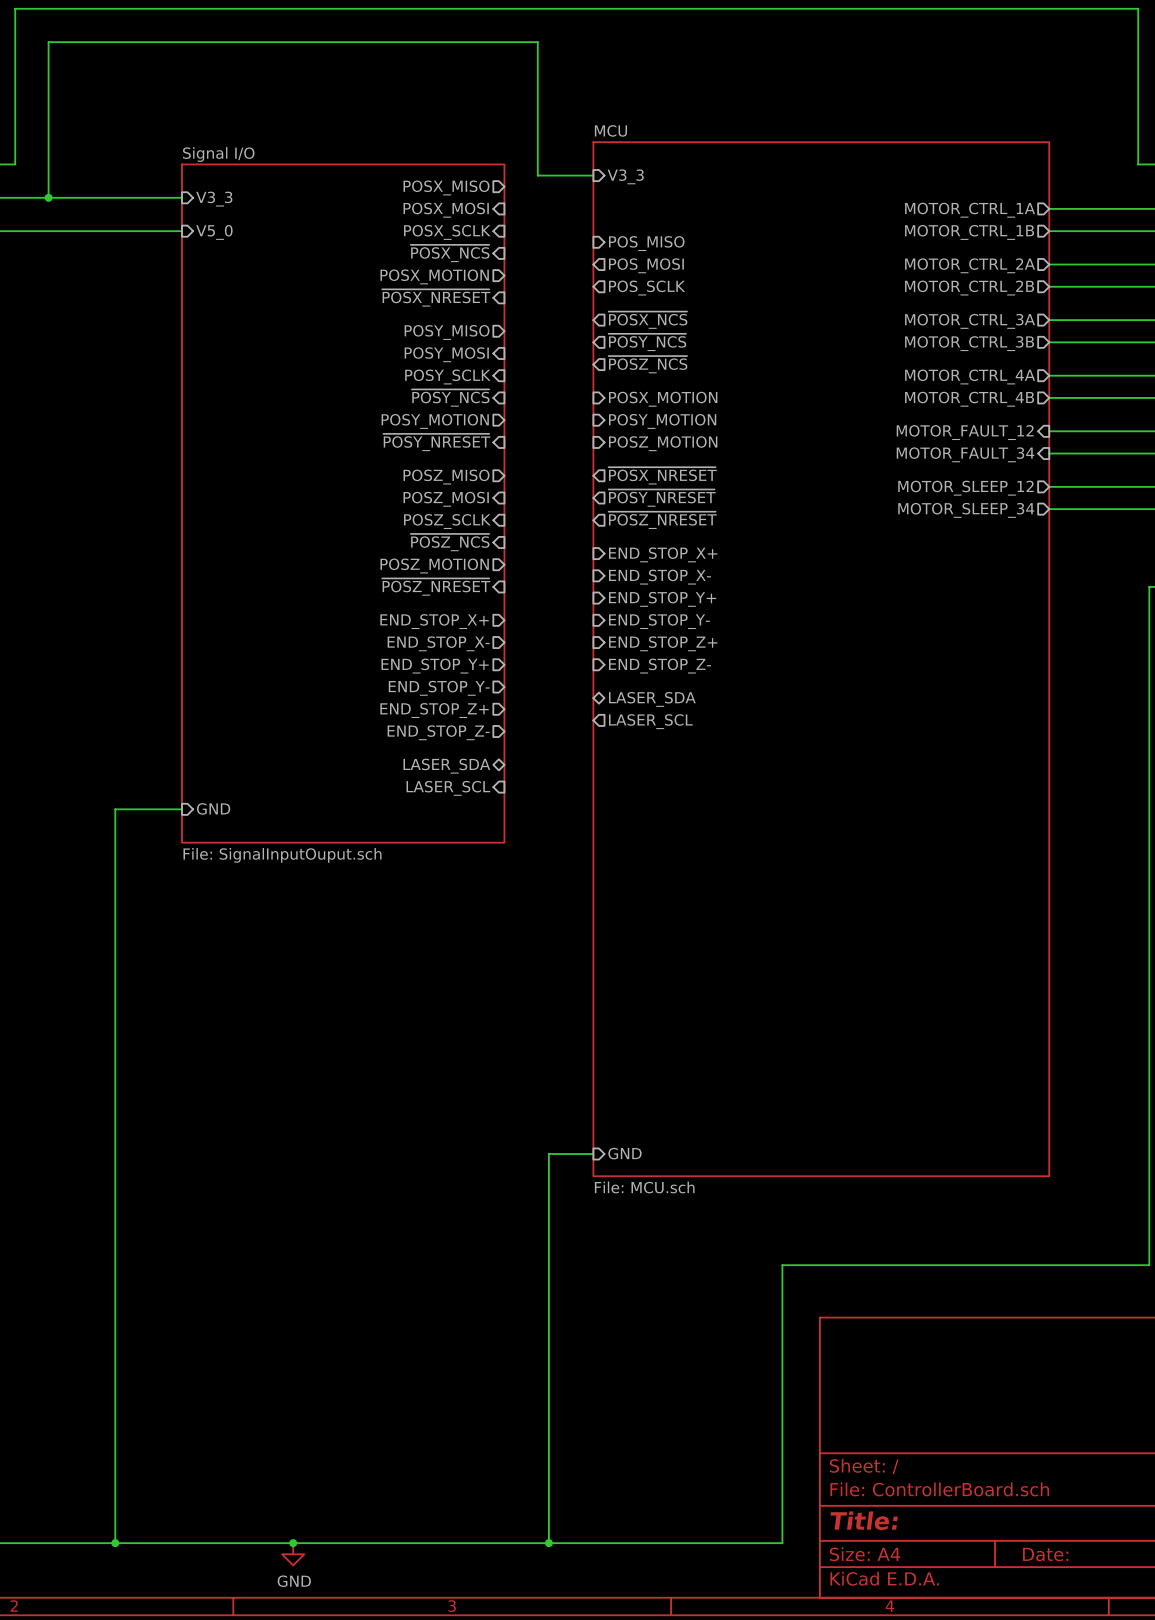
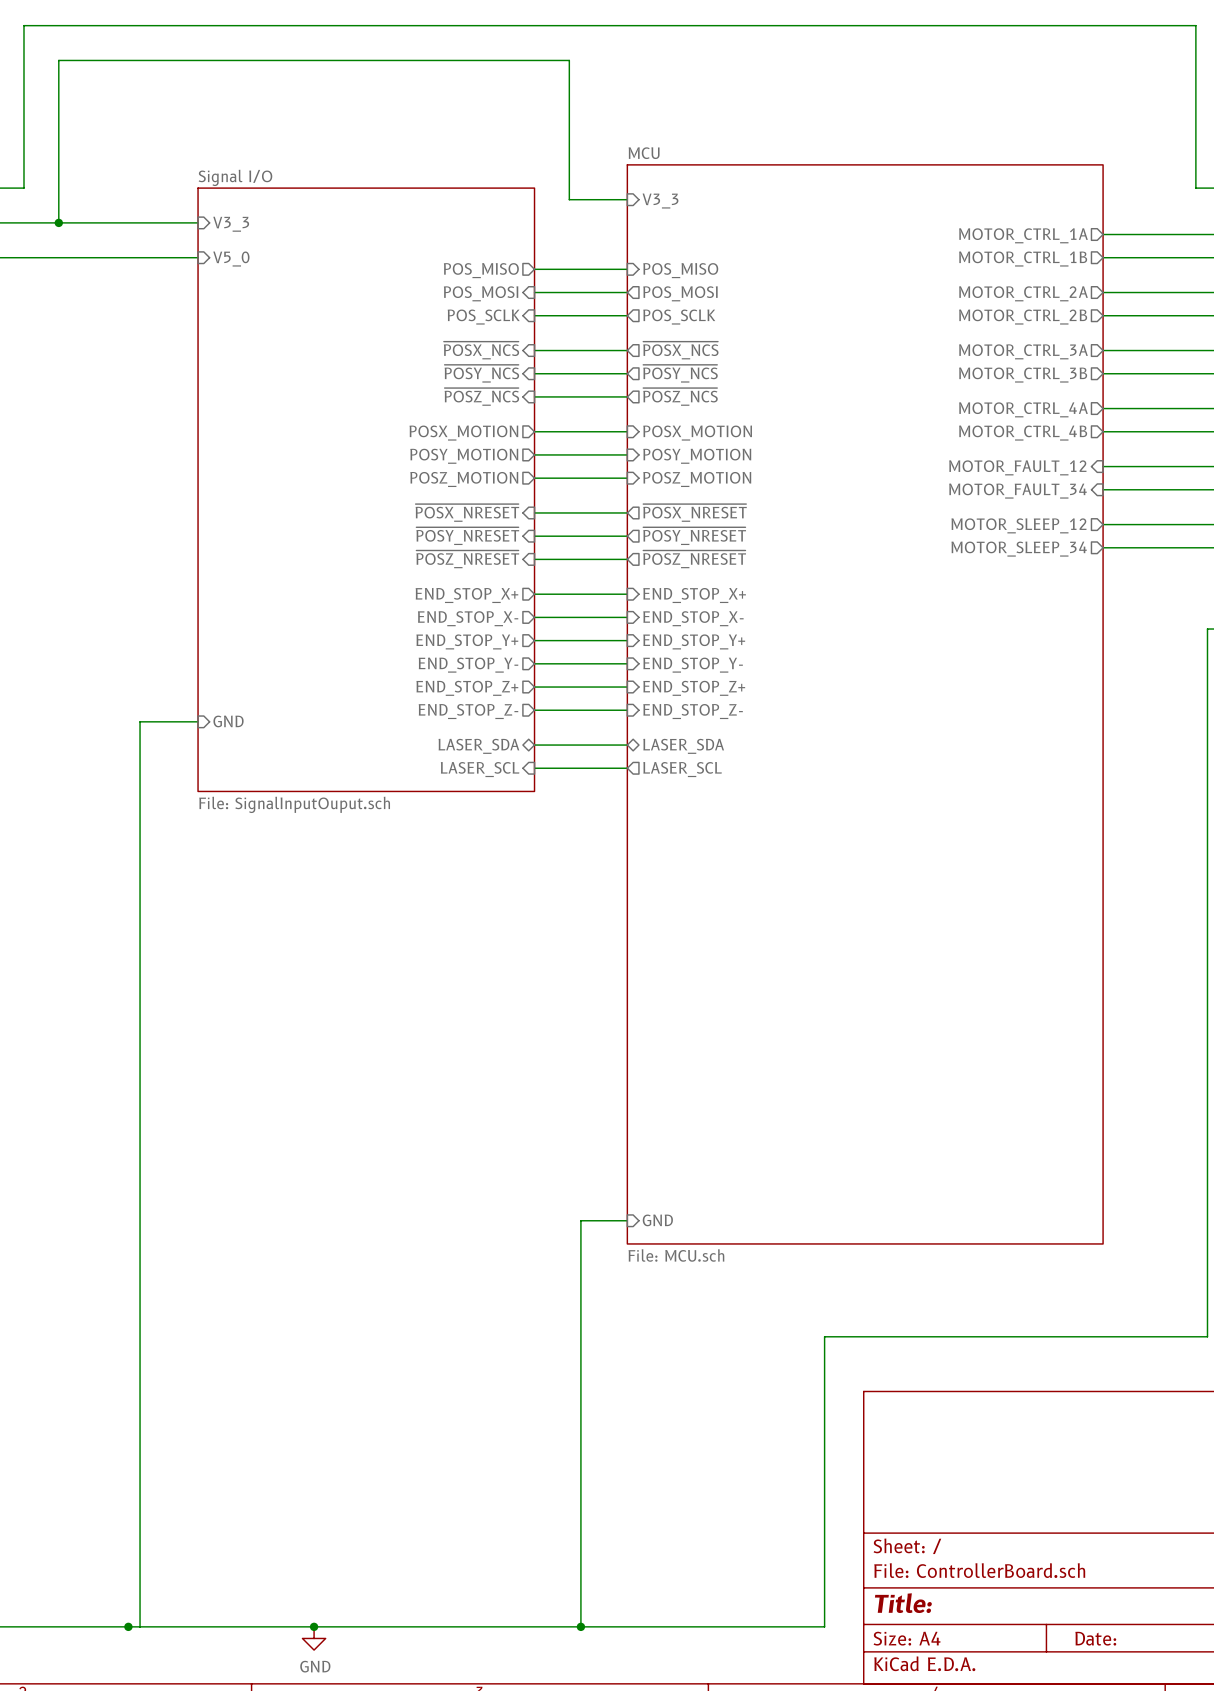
sheet pin: POSX_MISO (446, 187) -> none
sheet pin: POSX_MOSI (446, 210) -> none
sheet pin: POSX_SCLK (447, 232) -> none
wire: none -> (534, 269) (627, 269)
sheet pin: none -> POS_MISO (481, 270)
sheet pin position: ~{POSX_NCS} (450, 253) -> ~{POSX_NCS} (481, 350)
wire: none -> (534, 292) (627, 292)
sheet pin shape: output (434, 276) -> input (481, 293)
sheet pin: POSX_MOTION (434, 276) -> POS_MOSI (481, 293)
wire: none -> (534, 315) (627, 315)
sheet pin: none -> POS_SCLK (483, 317)
sheet pin: ~{POSX_NRESET} (436, 297) -> none
wire: none -> (534, 350) (627, 350)
sheet pin: POSY_MISO (447, 332) -> none
sheet pin: none -> ~{POSY_NCS} (481, 373)
wire: none -> (534, 373) (627, 373)
sheet pin: POSY_MOSI (446, 354) -> none
wire: none -> (534, 396) (627, 396)
sheet pin: POSY_SCLK (447, 376) -> none
wire: none -> (534, 431) (627, 431)
sheet pin shape: input (450, 398) -> output (463, 433)
sheet pin: ~{POSY_NCS} (450, 398) -> POSX_MOTION (463, 433)
wire: none -> (534, 454) (627, 454)
sheet pin shape: input (436, 442) -> output (464, 479)
sheet pin: ~{POSY_NRESET} (436, 442) -> POSZ_MOTION (464, 479)
wire: none -> (534, 478) (627, 478)
sheet Signal I/O: none -> File: SignalInputOuput.sch (366, 489)
wire: none -> (534, 512) (627, 512)
sheet pin shape: output (446, 477) -> input (467, 512)
sheet pin: POSZ_MISO (446, 477) -> ~{POSX_NRESET} (467, 512)
wire: none -> (534, 536) (627, 536)
sheet pin: POSZ_MOSI (446, 499) -> ~{POSY_NRESET} (467, 536)
sheet Signal I/O: File: SignalInputOuput.sch (343, 503) -> none
wire: none -> (534, 559) (627, 559)
sheet pin: POSZ_SCLK (447, 521) -> ~{POSZ_NRESET} (467, 559)
sheet pin position: ~{POSZ_NCS} (450, 542) -> ~{POSZ_NCS} (481, 396)
wire: none -> (534, 594) (627, 594)
sheet pin: none -> END_STOP_X+ (466, 595)
sheet pin: POSZ_MOTION (434, 566) -> none
wire: none -> (534, 617) (627, 617)
sheet pin: none -> END_STOP_X- (468, 618)
sheet pin: ~{POSZ_NRESET} (436, 587) -> none
wire: none -> (534, 640) (627, 640)
sheet pin: none -> END_STOP_Y+ (467, 641)
wire: none -> (534, 663) (627, 663)
sheet pin: END_STOP_X+ (434, 621) -> END_STOP_Y- (468, 665)
wire: none -> (534, 687) (627, 687)
sheet pin: END_STOP_X- (438, 643) -> END_STOP_Z+ (467, 688)
wire: none -> (534, 710) (627, 710)
sheet pin: END_STOP_Y+ (435, 666) -> END_STOP_Z- (468, 711)
wire: none -> (198, 721) (140, 721) (140, 1626)
sheet pin: END_STOP_Y- (439, 688) -> none
wire: none -> (534, 745) (627, 745)
sheet pin: END_STOP_Z+ (434, 710) -> none
wire: none -> (534, 768) (627, 768)
sheet pin: END_STOP_Z- (438, 732) -> none
sheet pin position: LASER_SDA (446, 766) -> LASER_SDA (478, 746)
sheet pin position: LASER_SCL (448, 788) -> LASER_SCL (480, 769)
sheet pin position: GND (213, 808) -> GND (228, 721)
wire: (182, 809) (115, 809) (115, 1543) -> none

